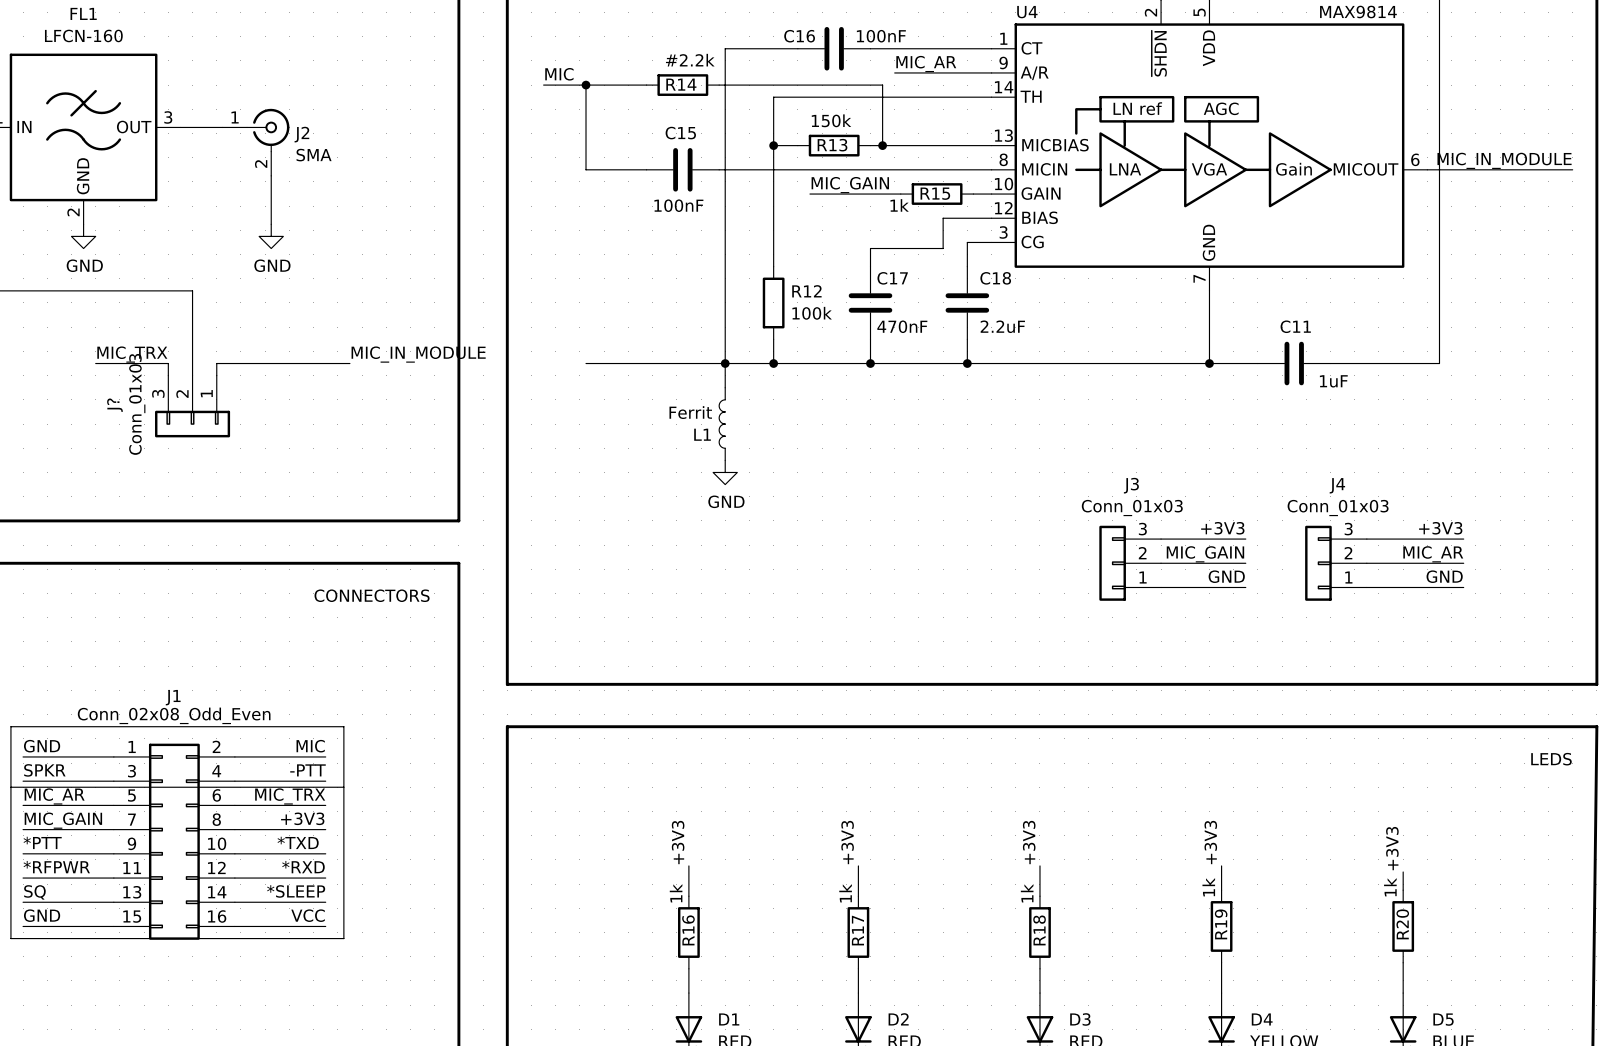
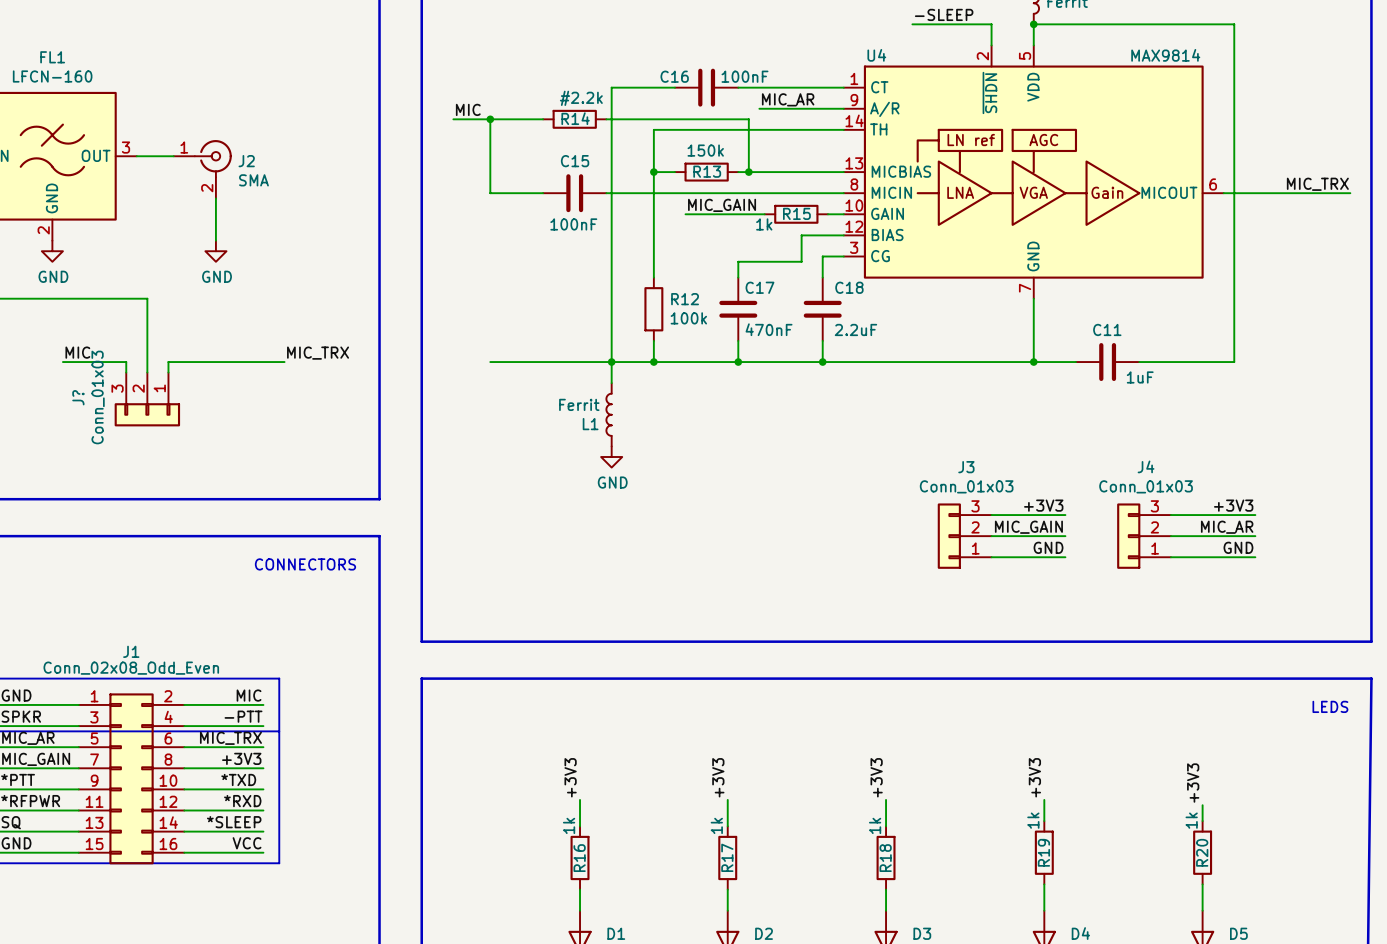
label: MIC_IN_MODULE (1504, 160) -> MIC_TRX (1317, 184)
label: MIC_TRX (132, 354) -> MIC (77, 352)
label: MIC_IN_MODULE (418, 354) -> MIC_TRX (318, 353)

